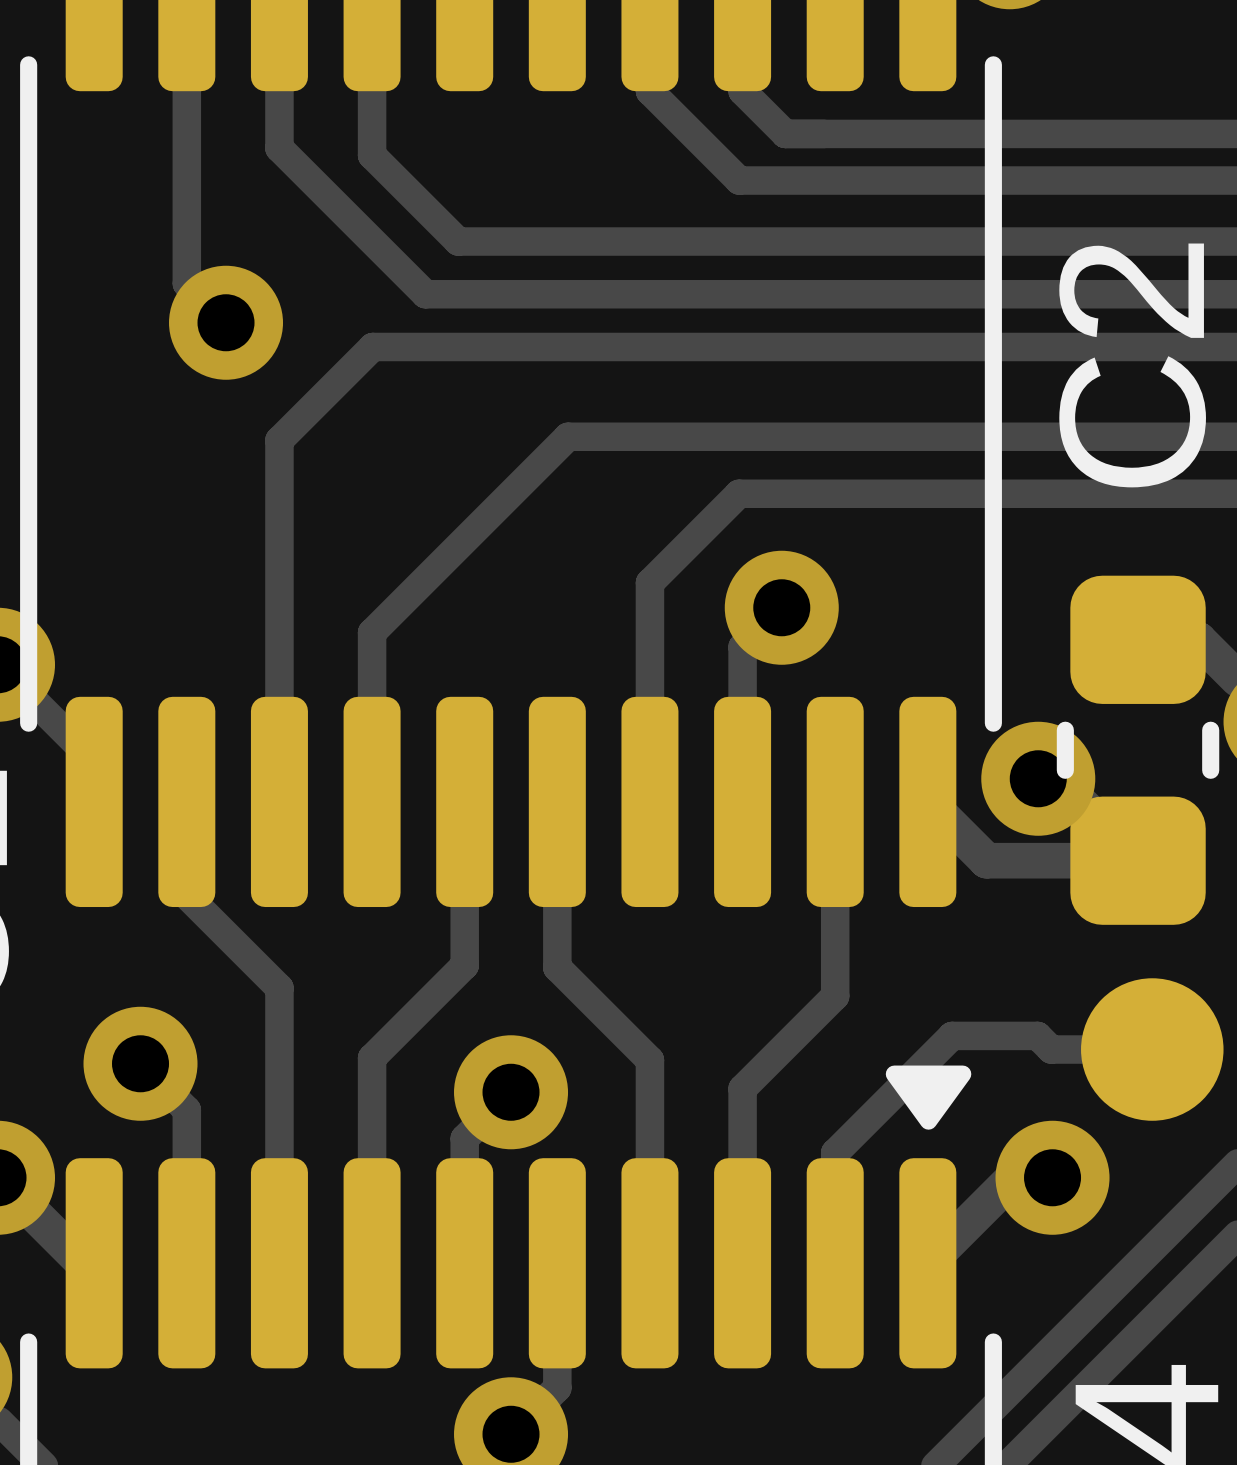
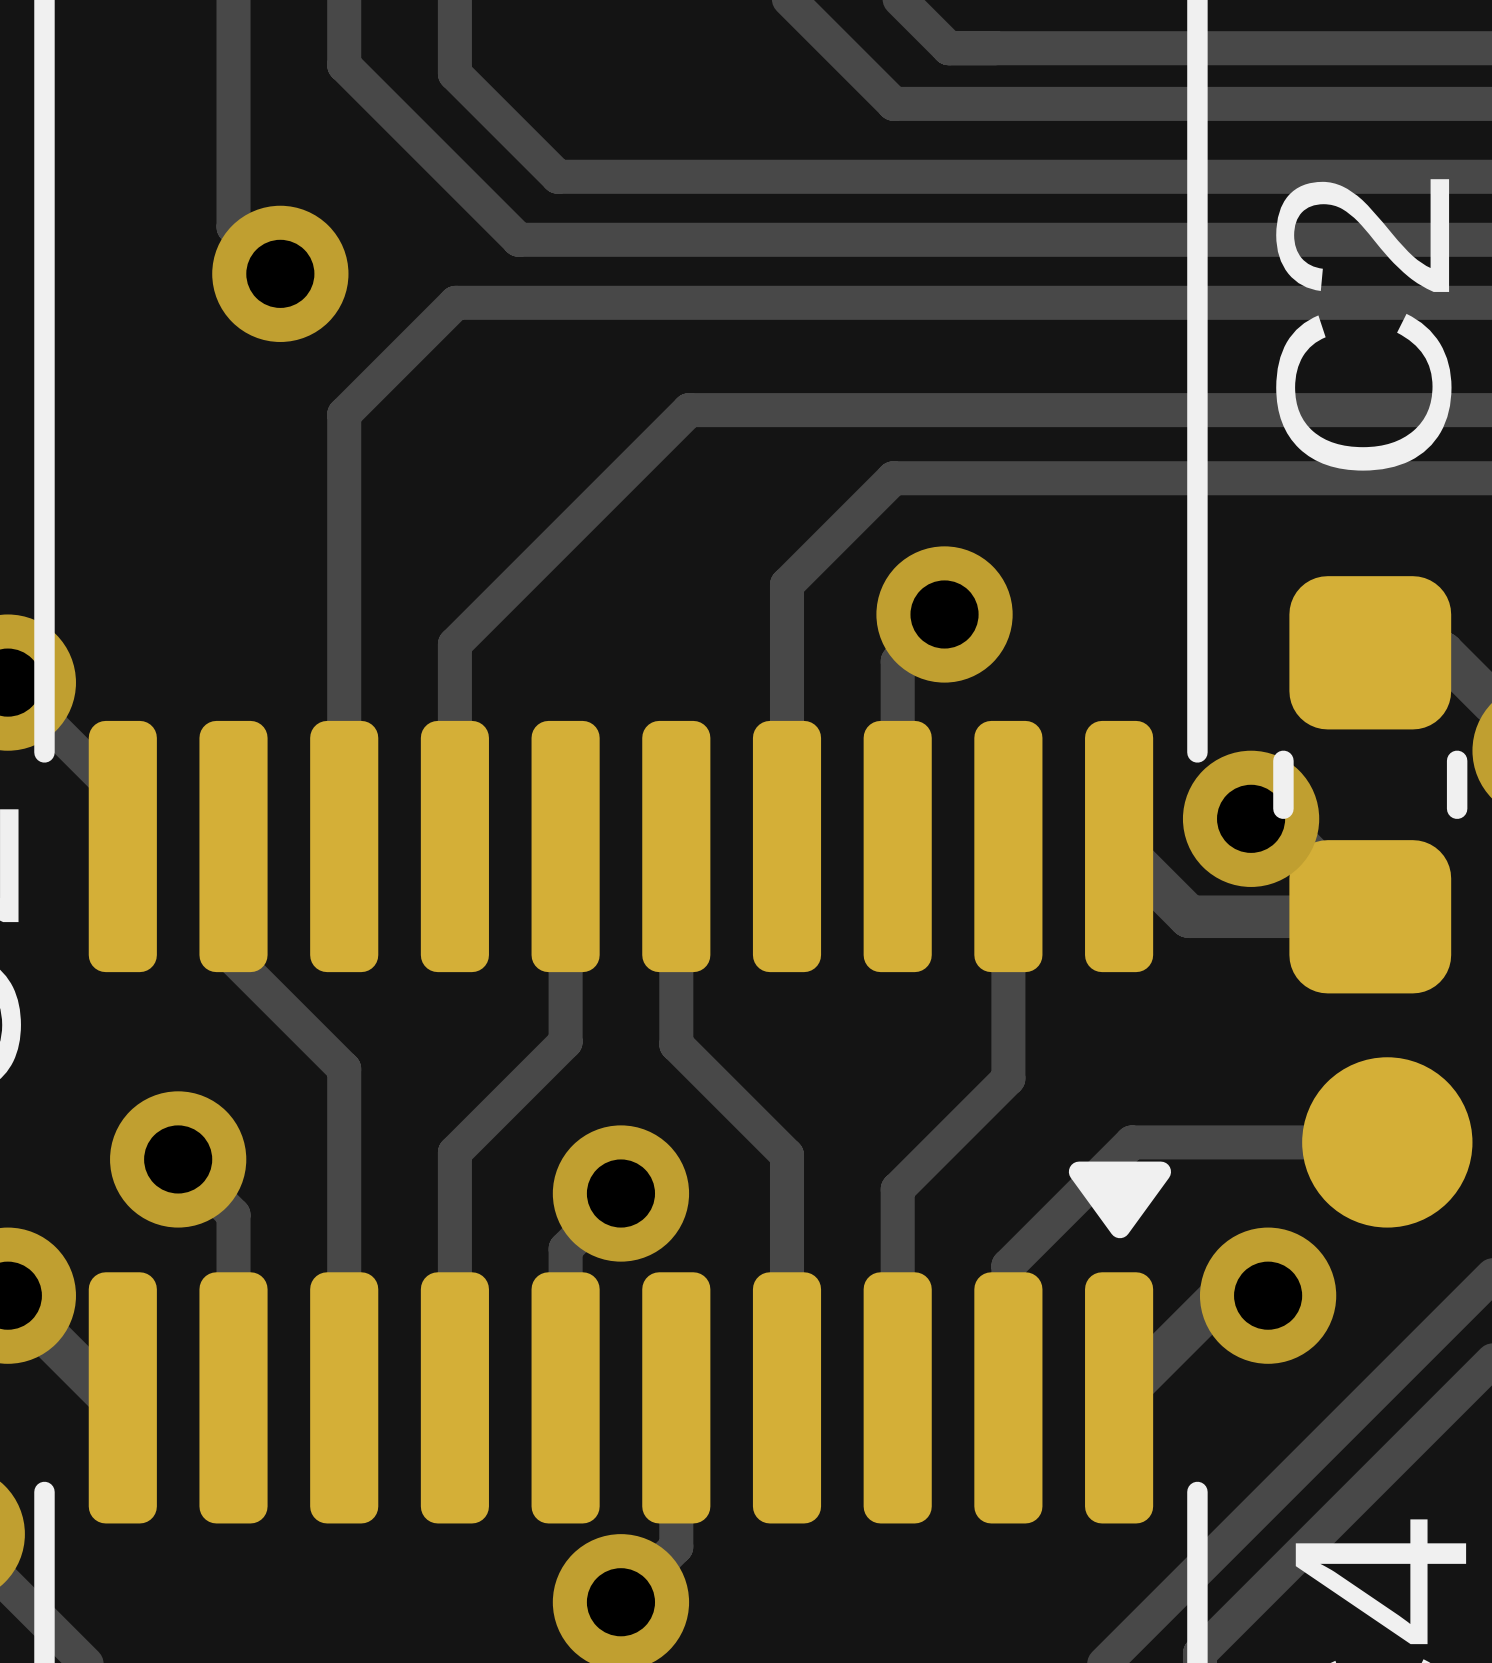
track: (938, 1049) (952, 1035) (1037, 1035) (1051, 1049) -> (1131, 1142) (1266, 1142)

